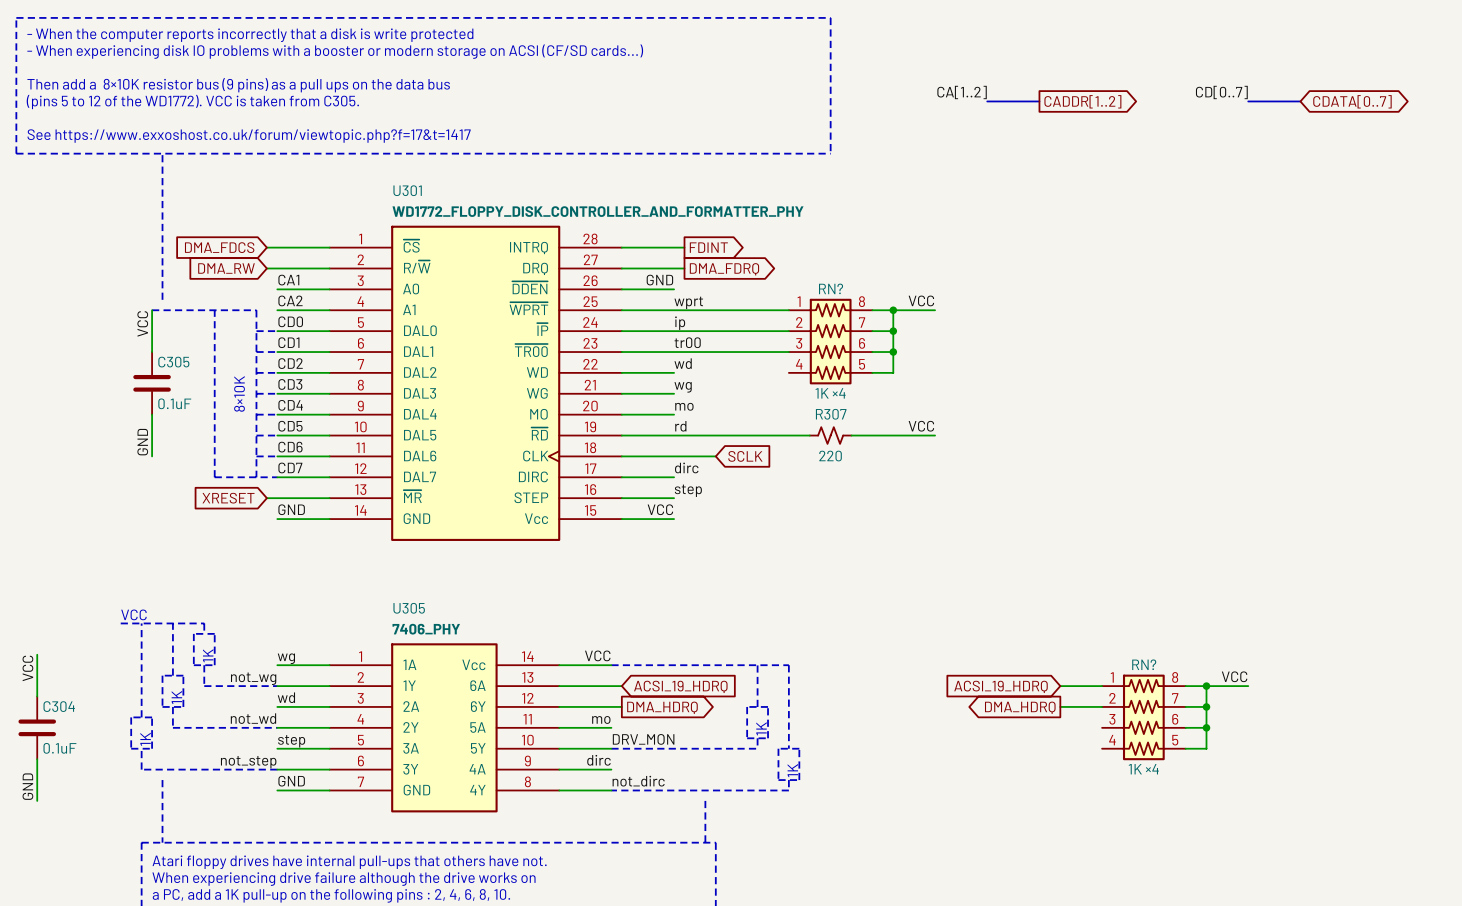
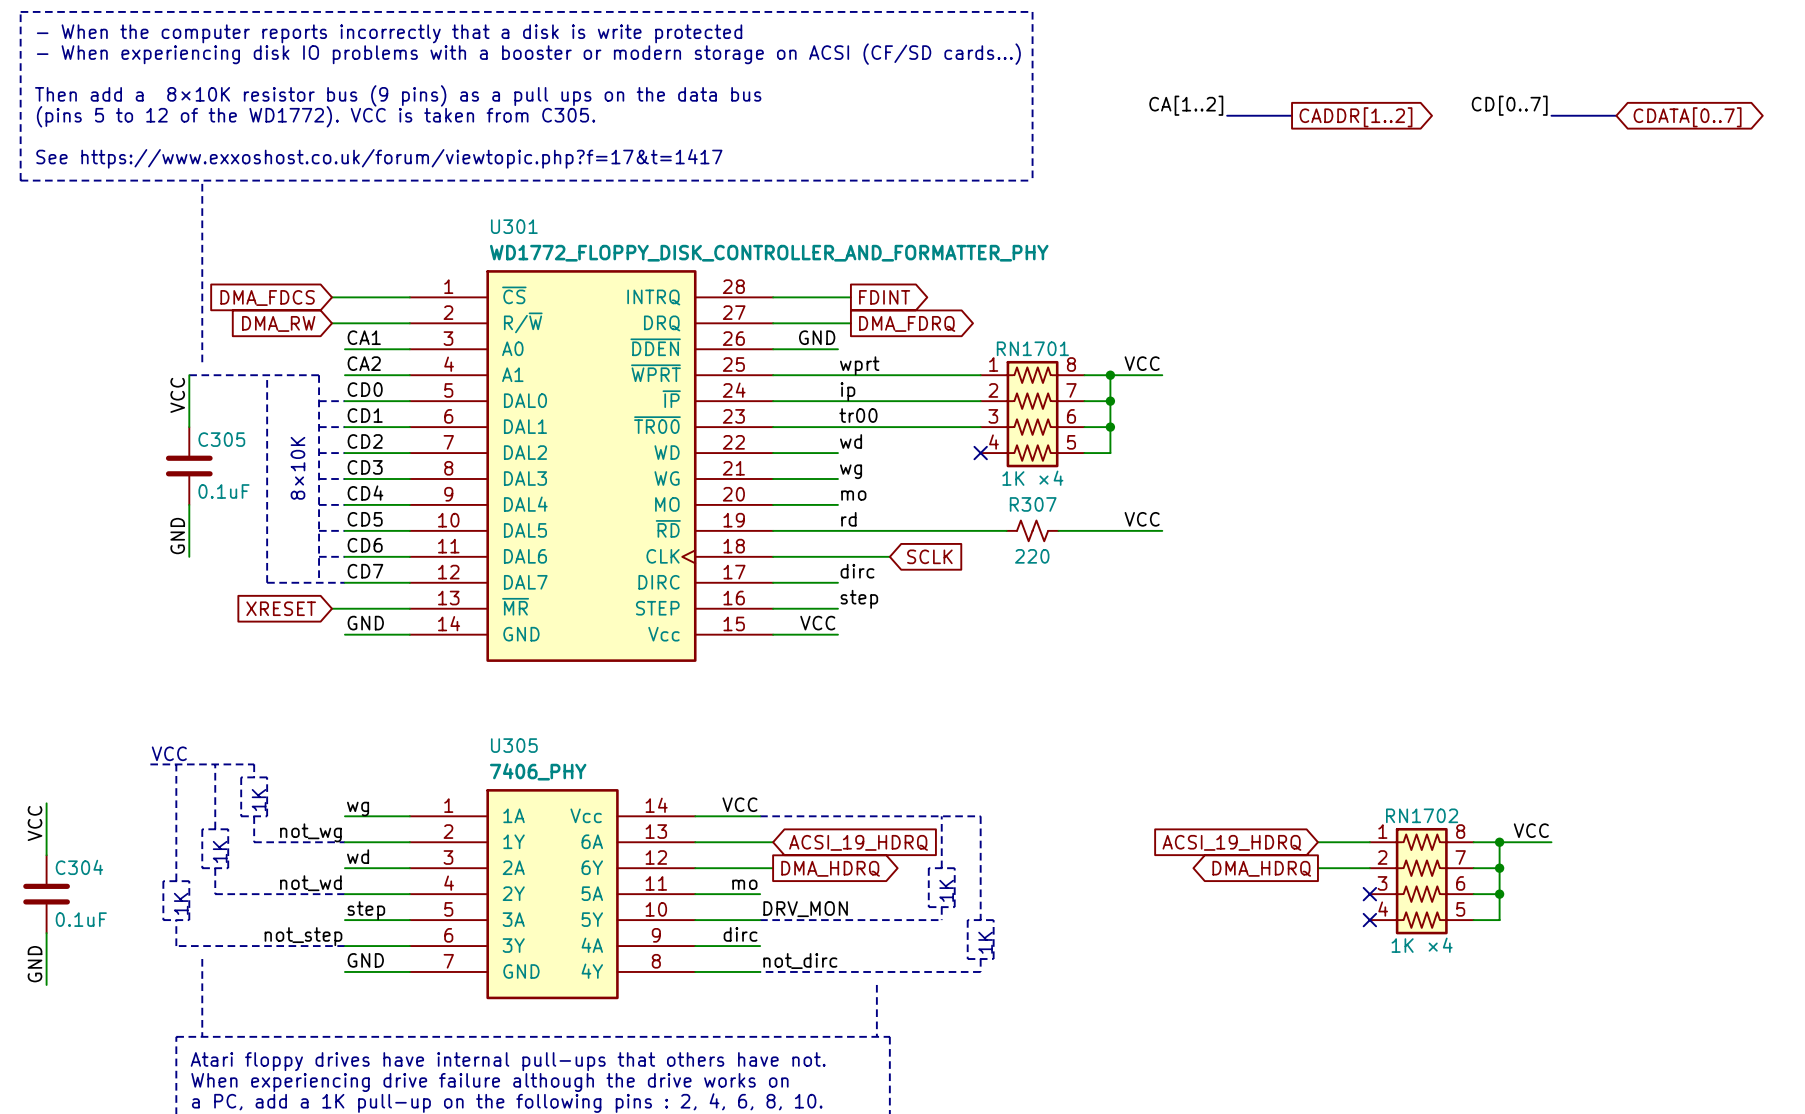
RN? name: RN? (831, 288) -> RN1701 (1032, 348)
no-connect mark: none -> (980, 453)
RN? name: RN? (1144, 664) -> RN1702 (1422, 815)
no-connect mark: none -> (1369, 894)
no-connect mark: none -> (1369, 920)

